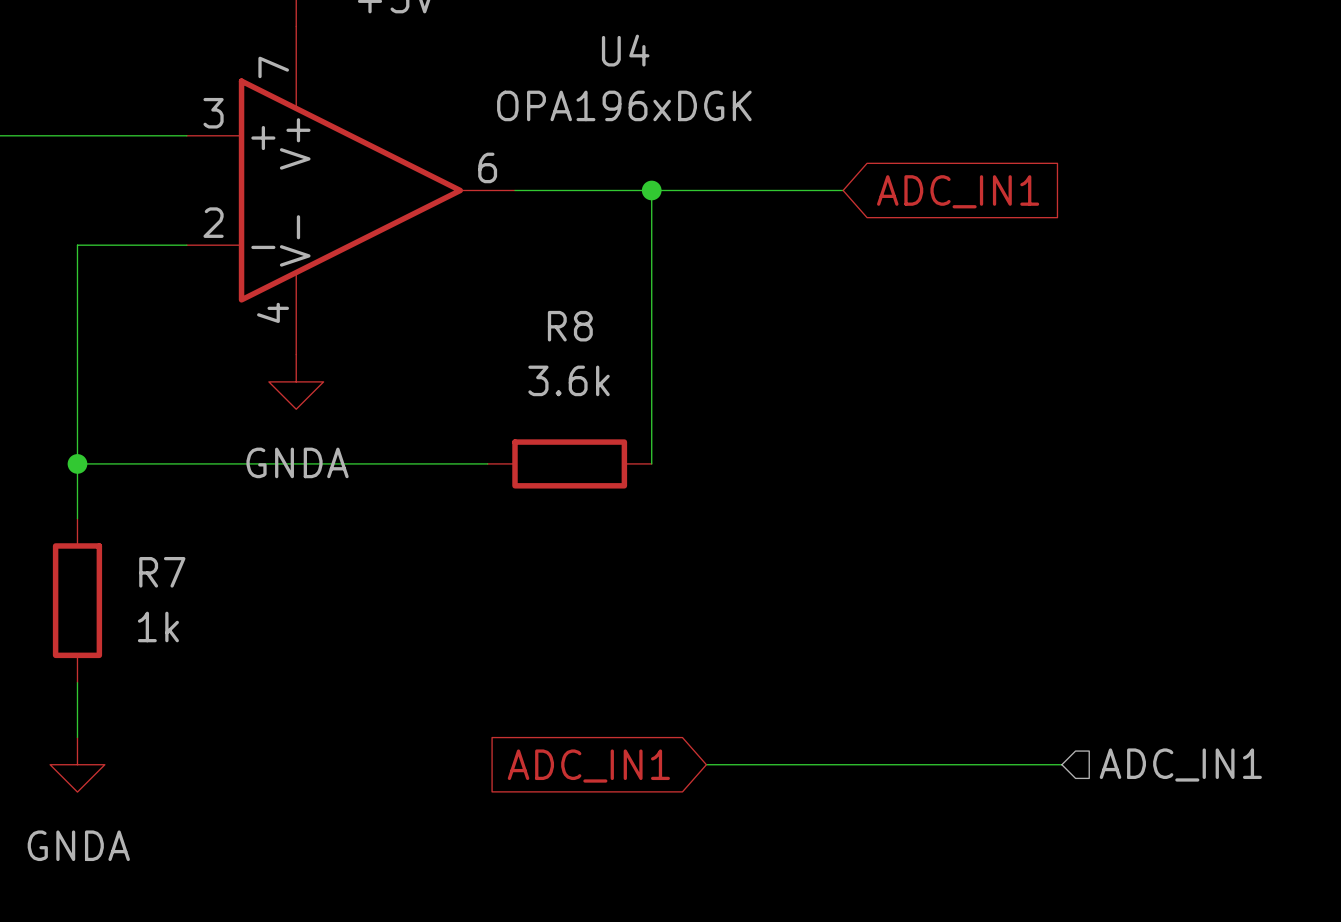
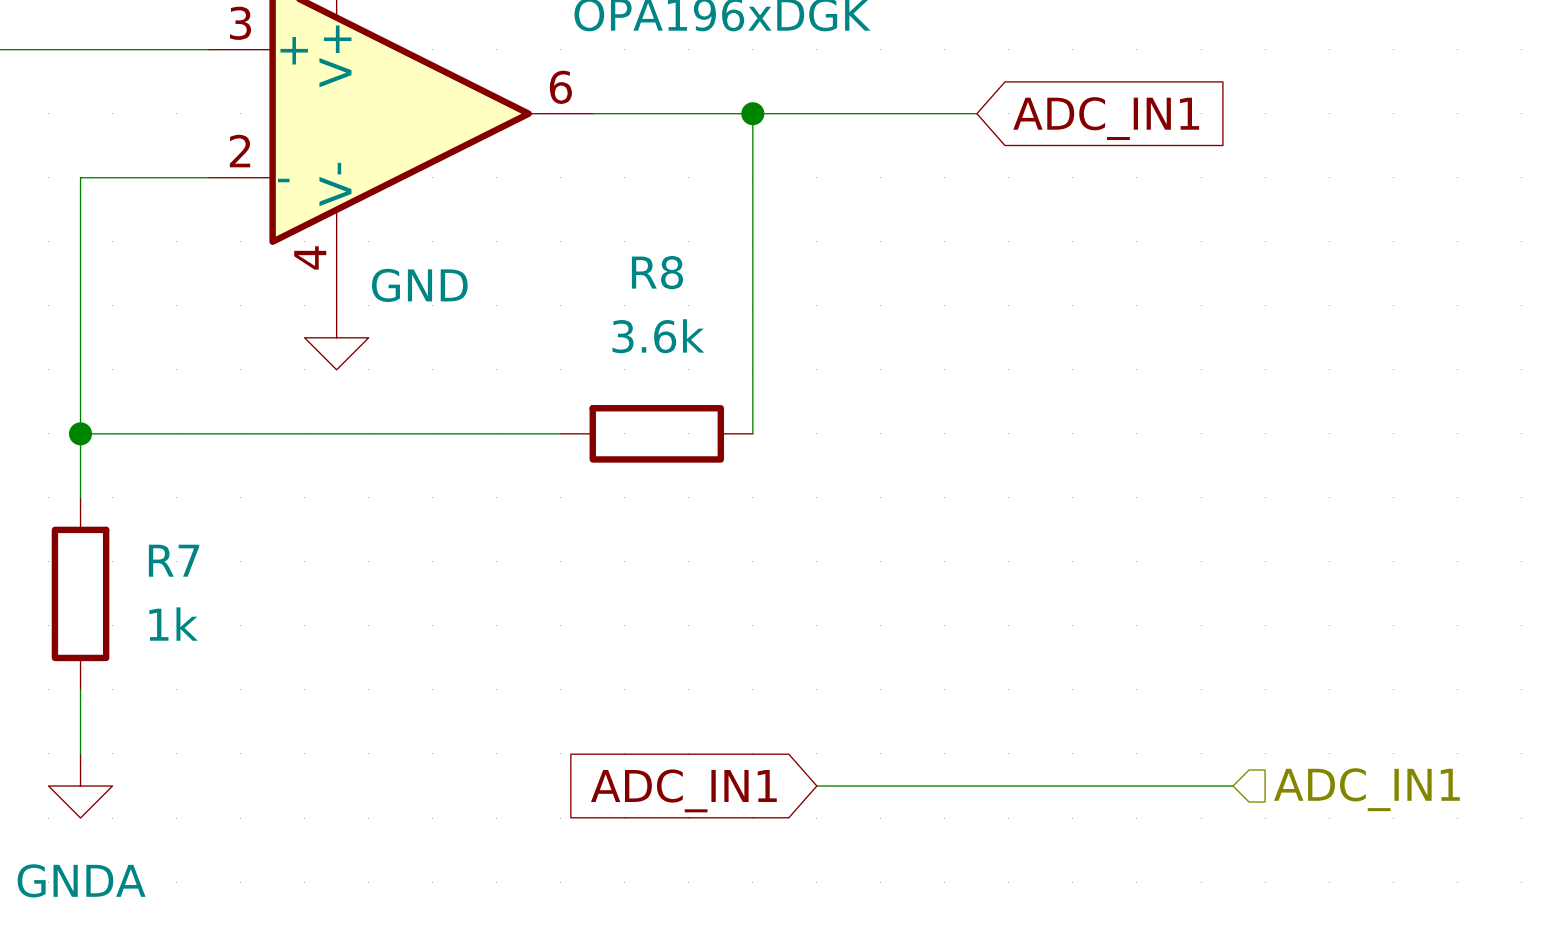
power symbol: GNDA (296, 381) -> GND (336, 337)

